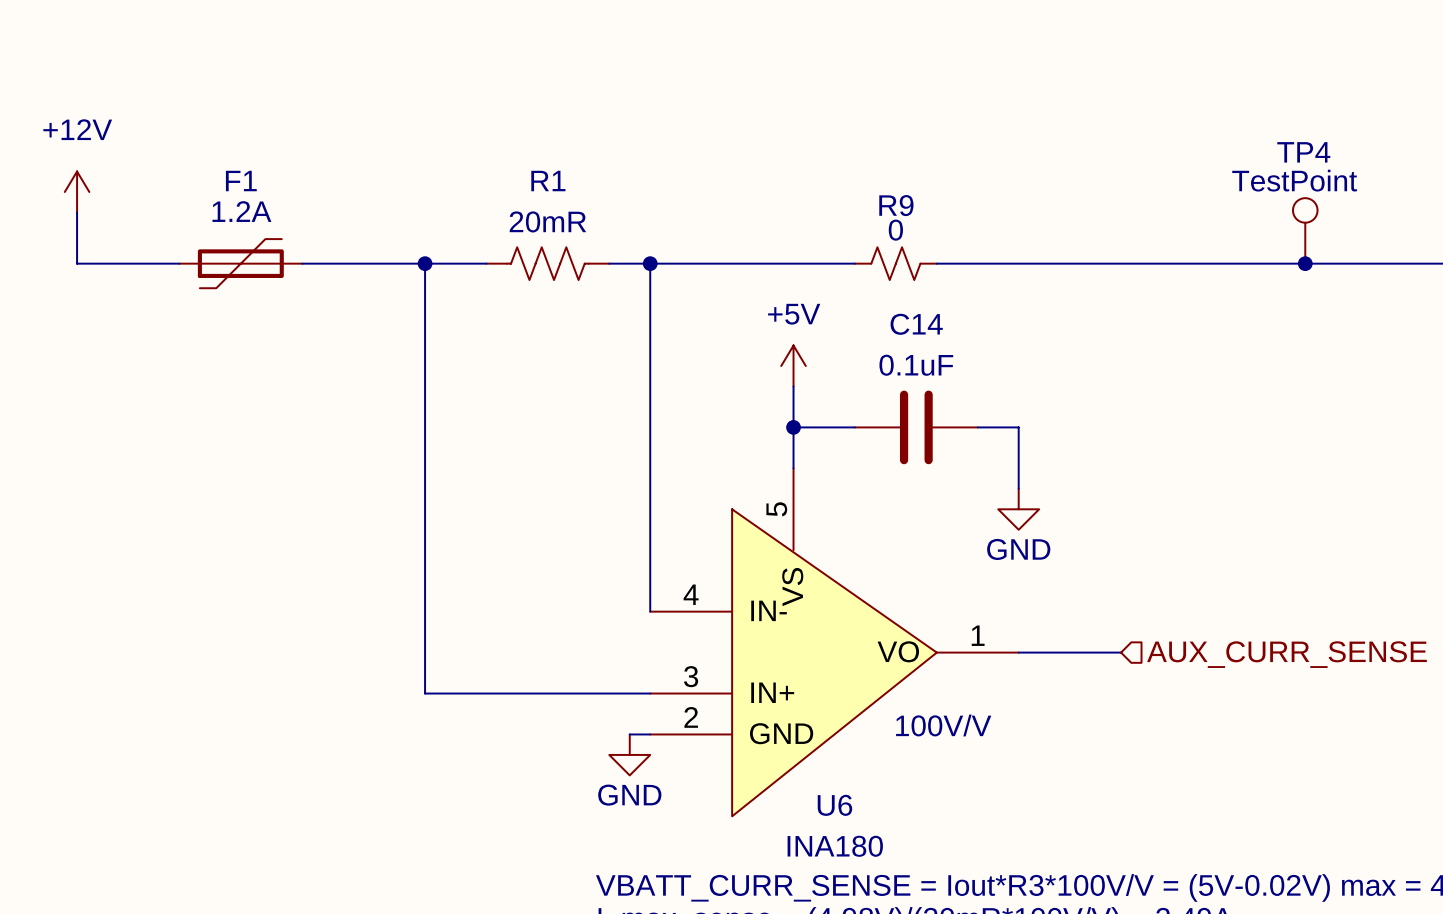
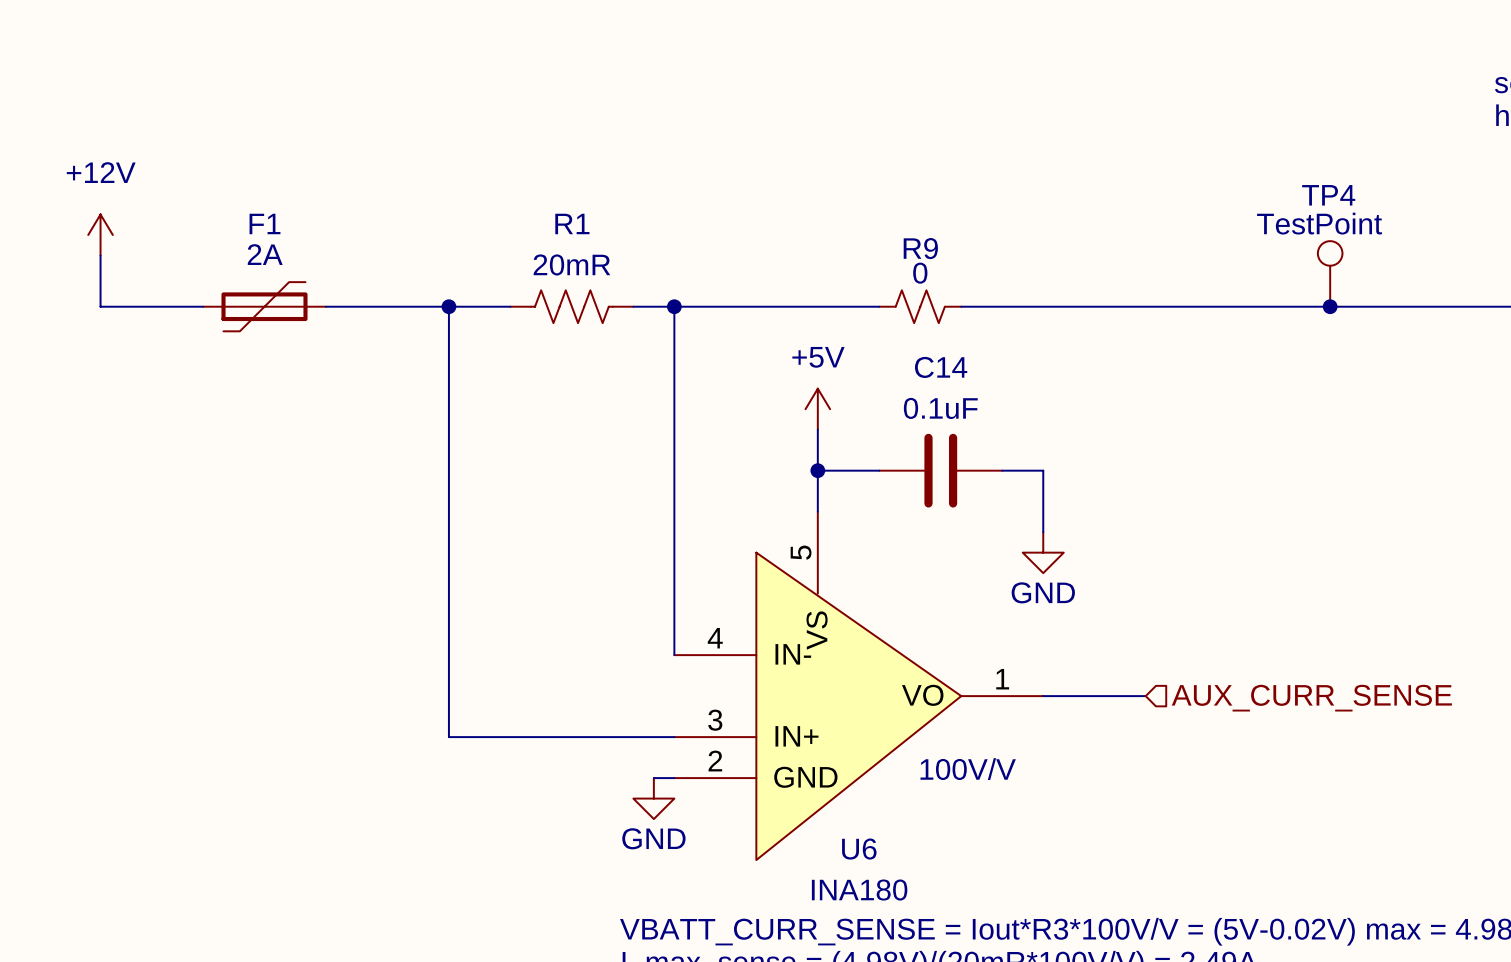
F1 value: 1.2A (241, 211) -> 2A (265, 254)

